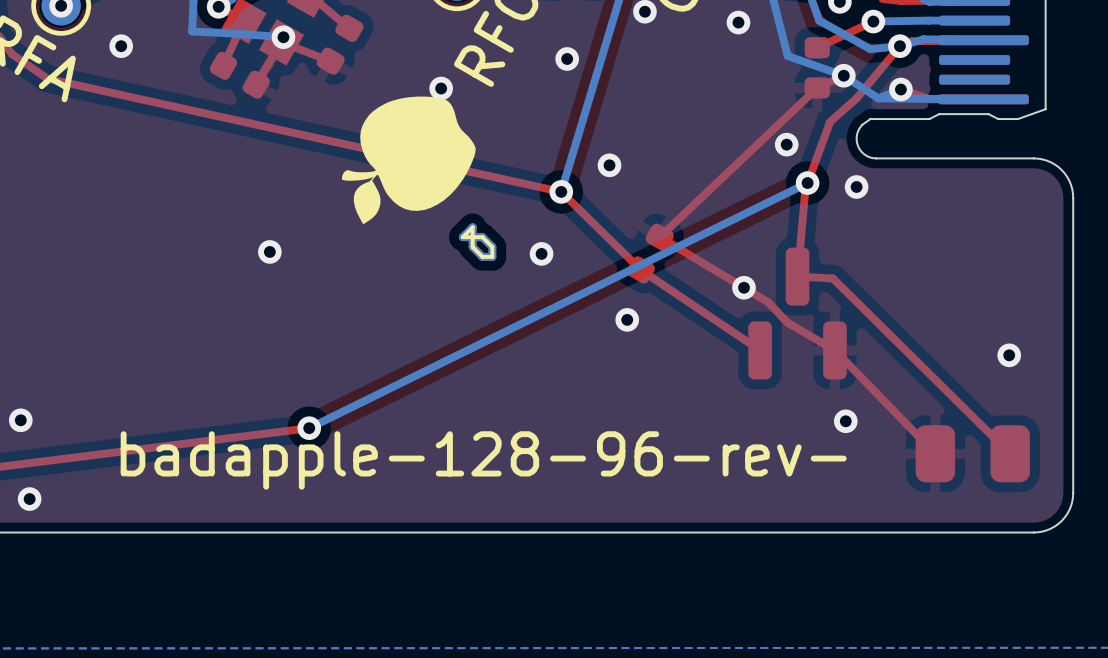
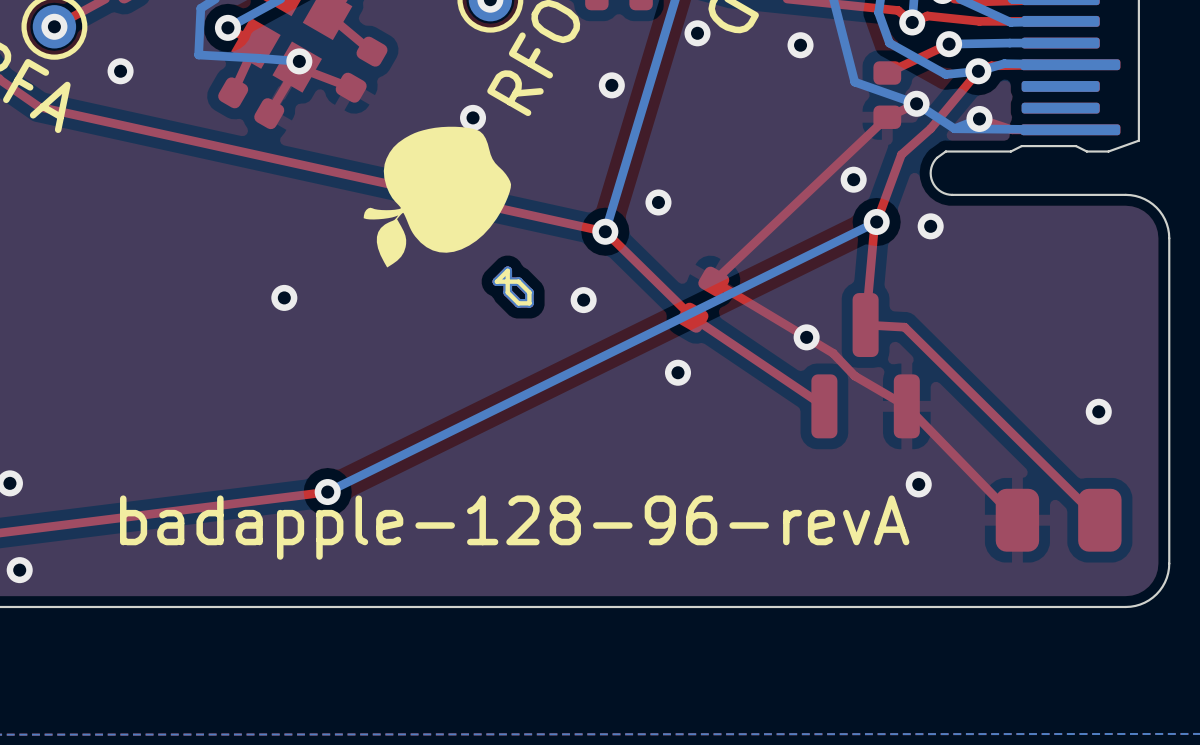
text: badapple-128-96-rev- (483, 460) -> badapple-128-96-revA (514, 527)

